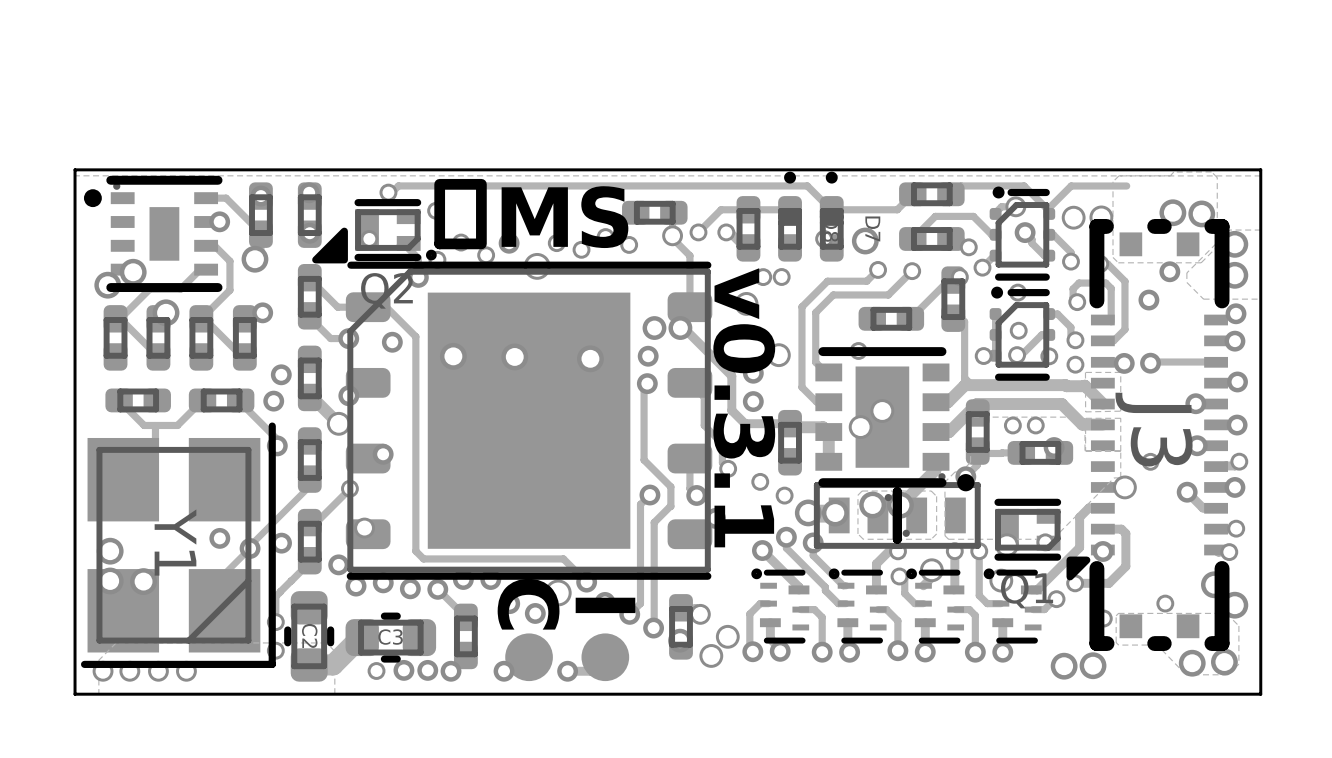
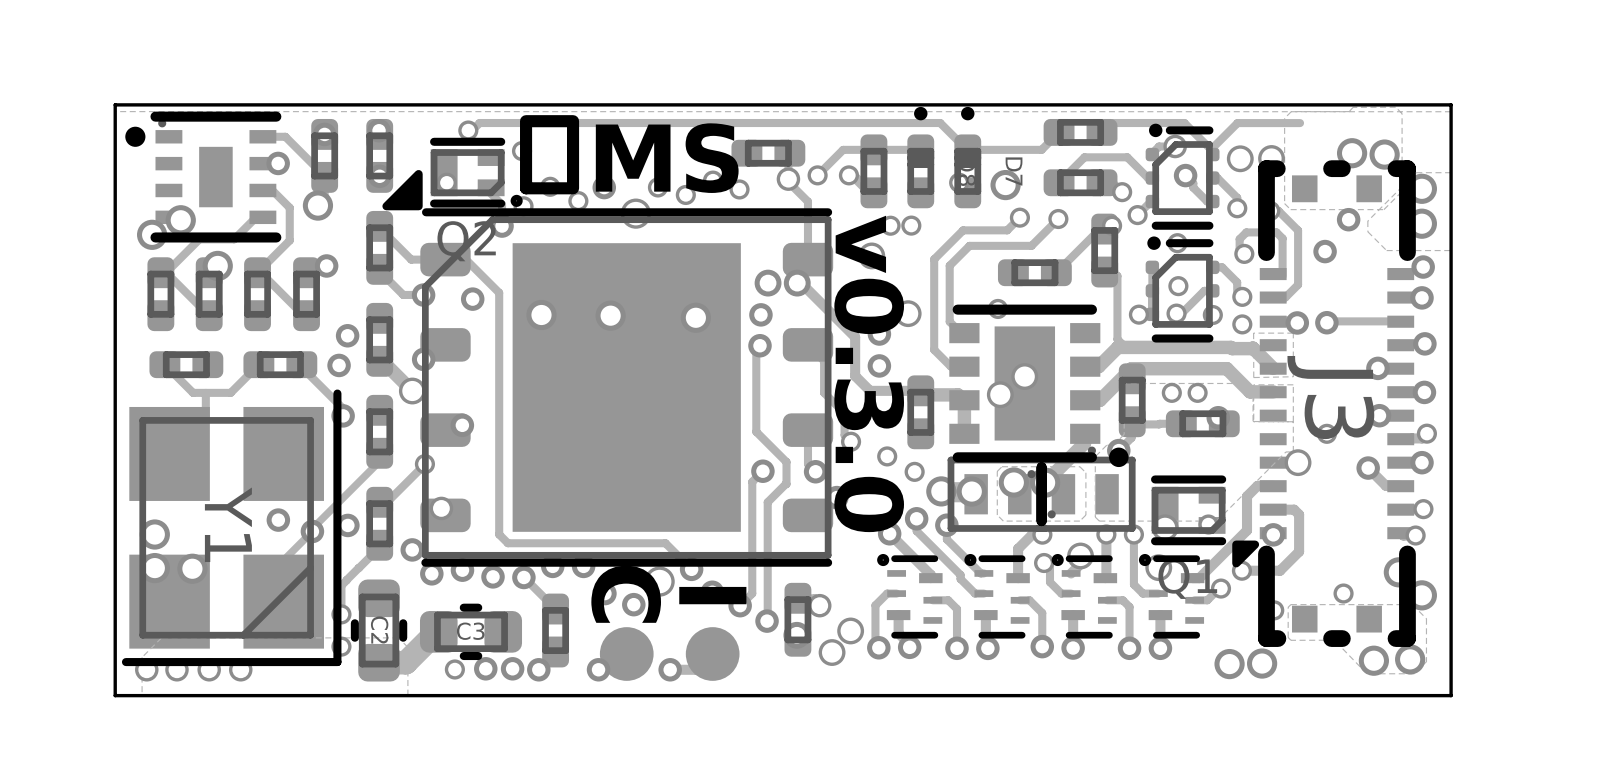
text: v0.3.1 (744, 407) -> v0.3.0 (869, 373)

